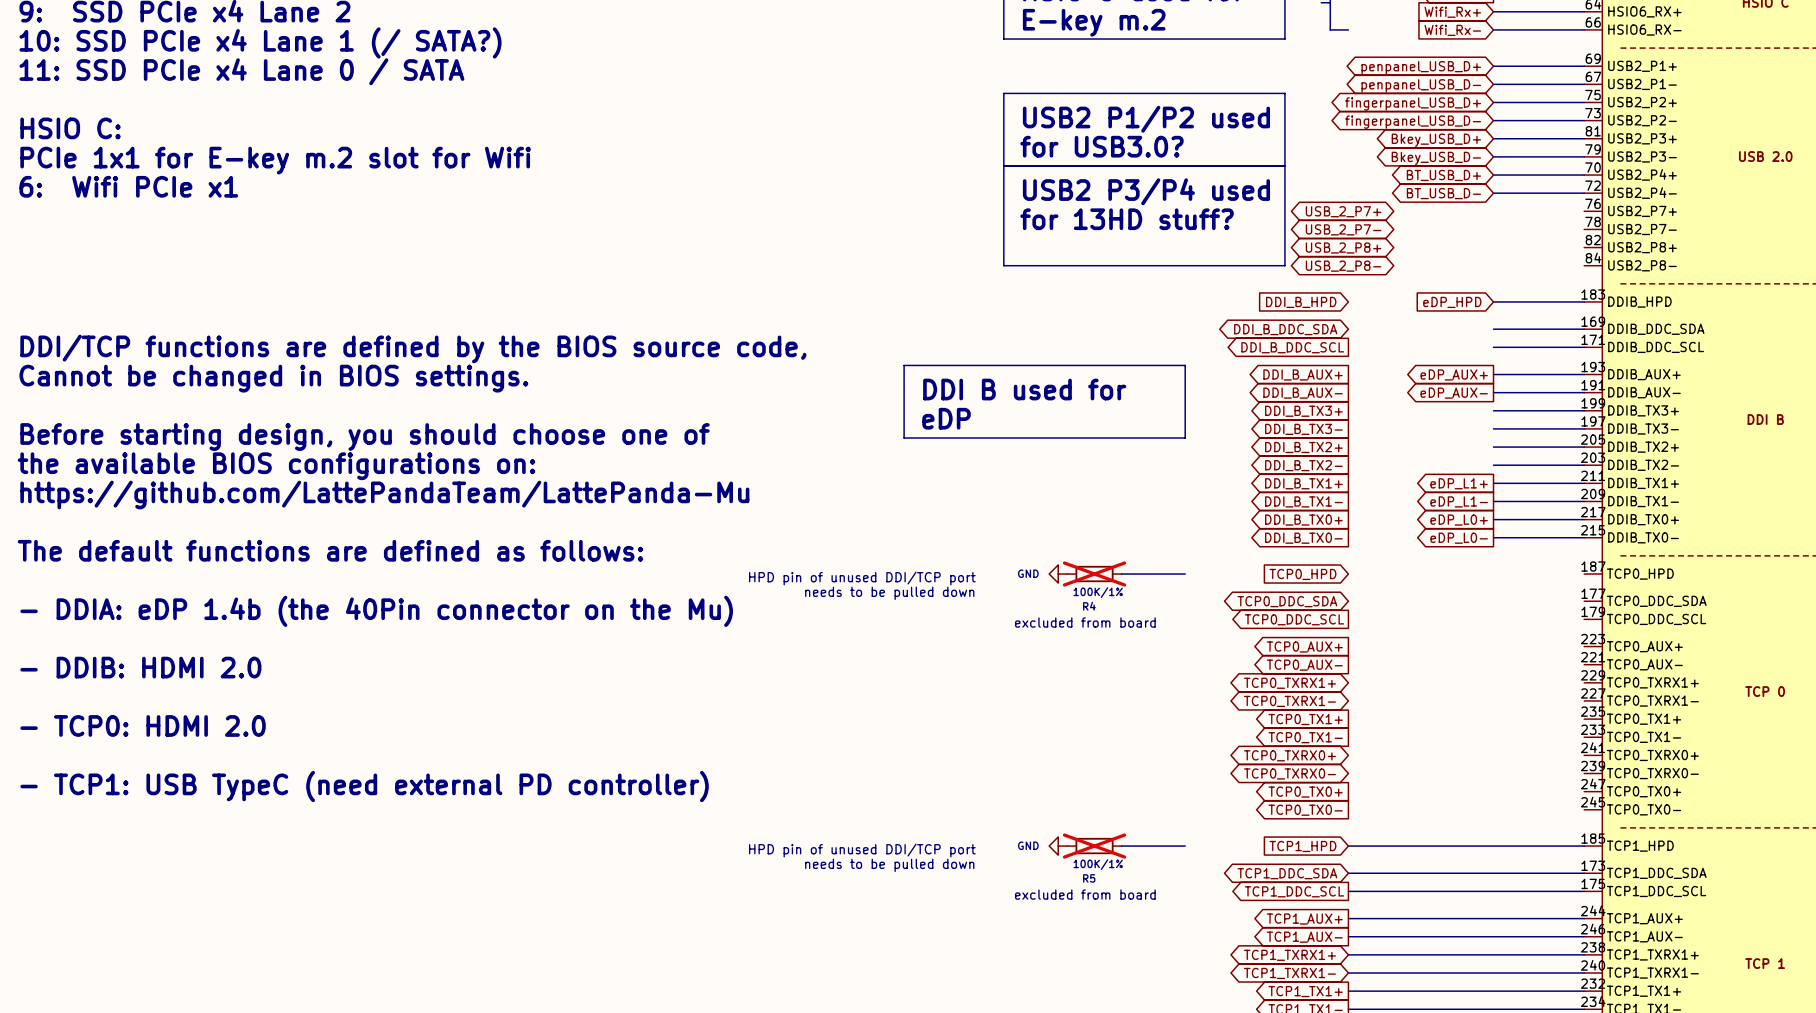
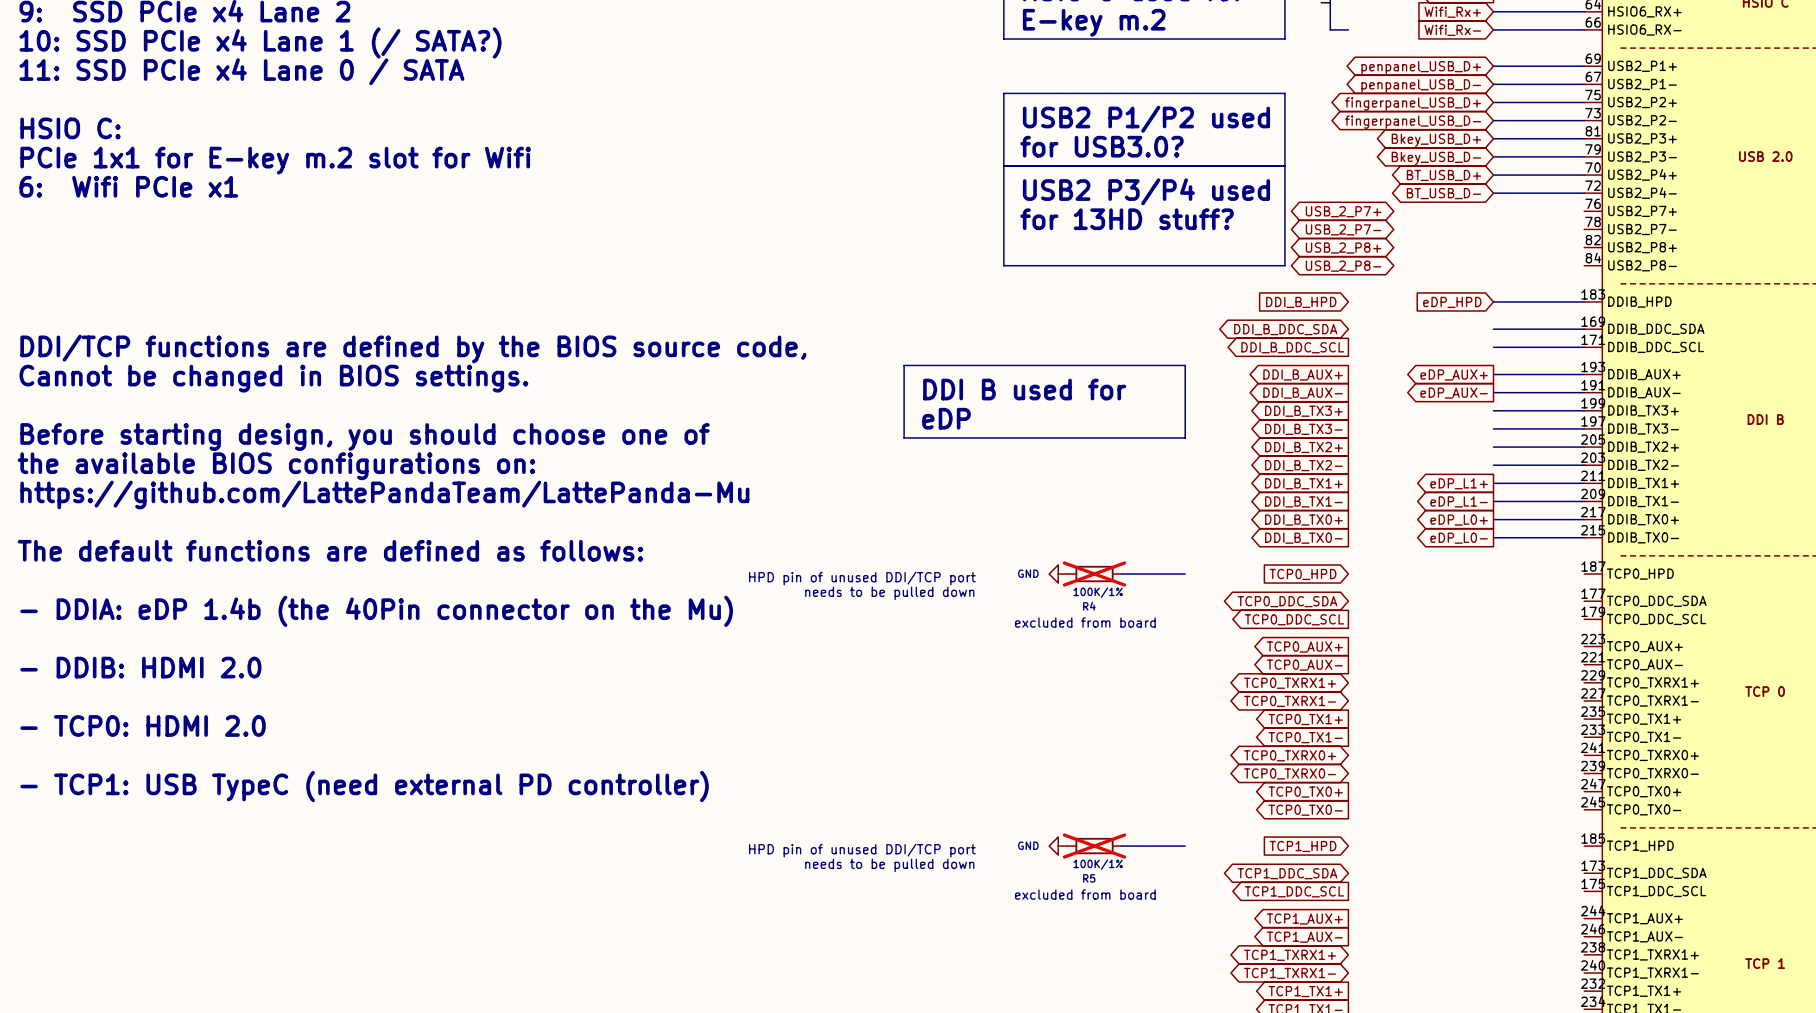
wire: (1348, 846) (1584, 846) -> none
wire: (1348, 873) (1584, 873) -> none
wire: (1348, 891) (1584, 891) -> none
wire: (1348, 918) (1584, 918) -> none
wire: (1348, 936) (1584, 936) -> none
wire: (1348, 954) (1584, 954) -> none
wire: (1348, 973) (1584, 973) -> none
wire: (1348, 991) (1584, 991) -> none
wire: (1348, 1009) (1584, 1009) -> none

